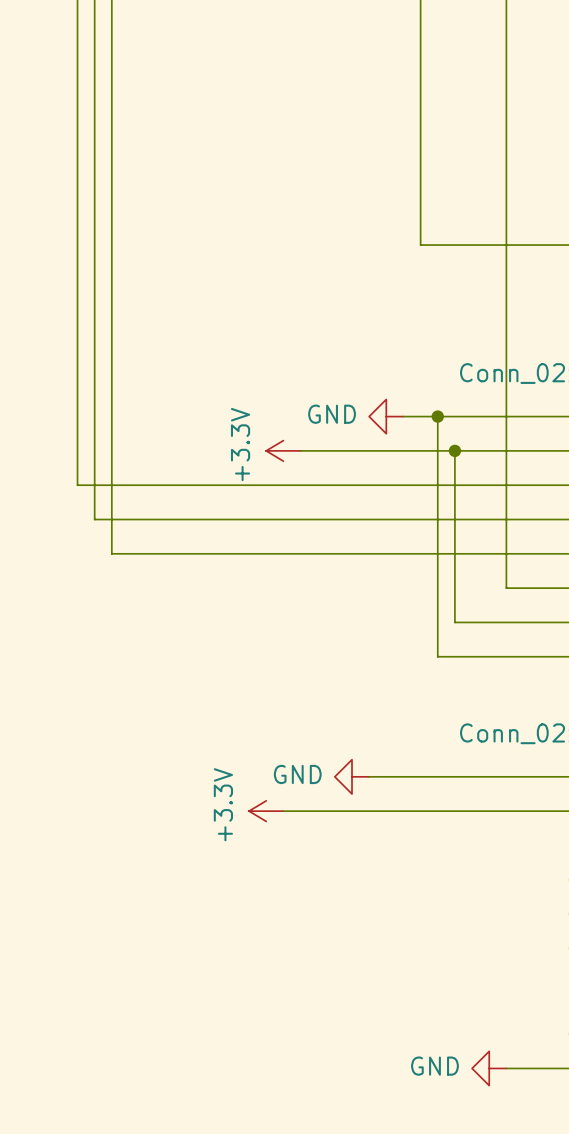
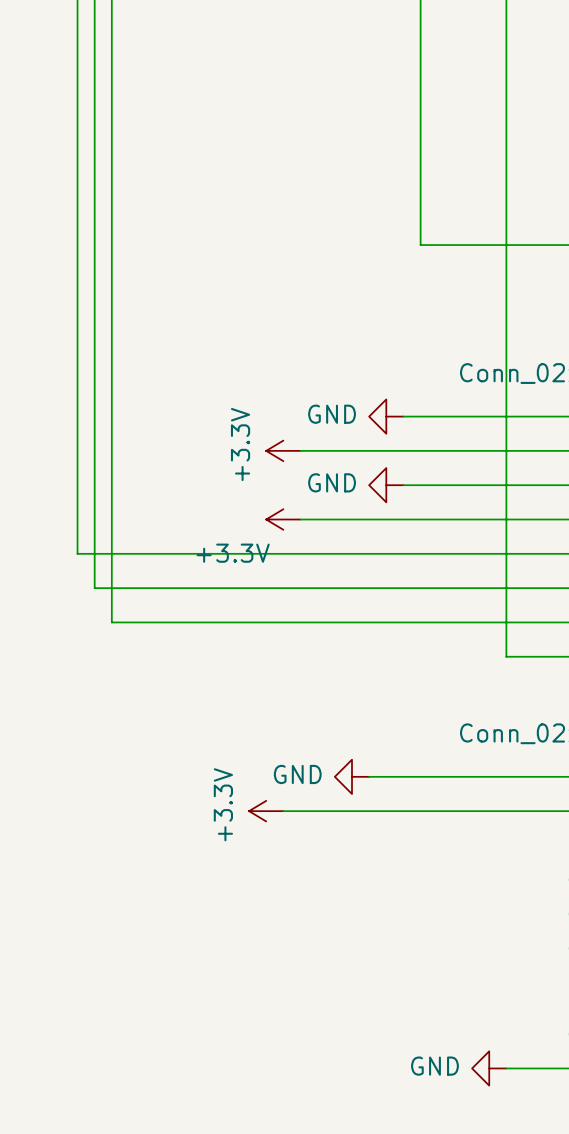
wire: (437, 416) (437, 656) (506, 656) -> none
junction: (437, 416) -> none
wire: (454, 450) (454, 622) -> none
junction: (454, 450) -> none
wire: (77, 485) (403, 485) -> (77, 485) (77, 553) (111, 553) (111, 622) (454, 622)
power symbol: none -> GND (386, 485)
wire: (94, 519) (300, 519) -> (94, 519) (94, 588) (506, 588) (506, 656)
power symbol: none -> +3.3V (283, 519)

